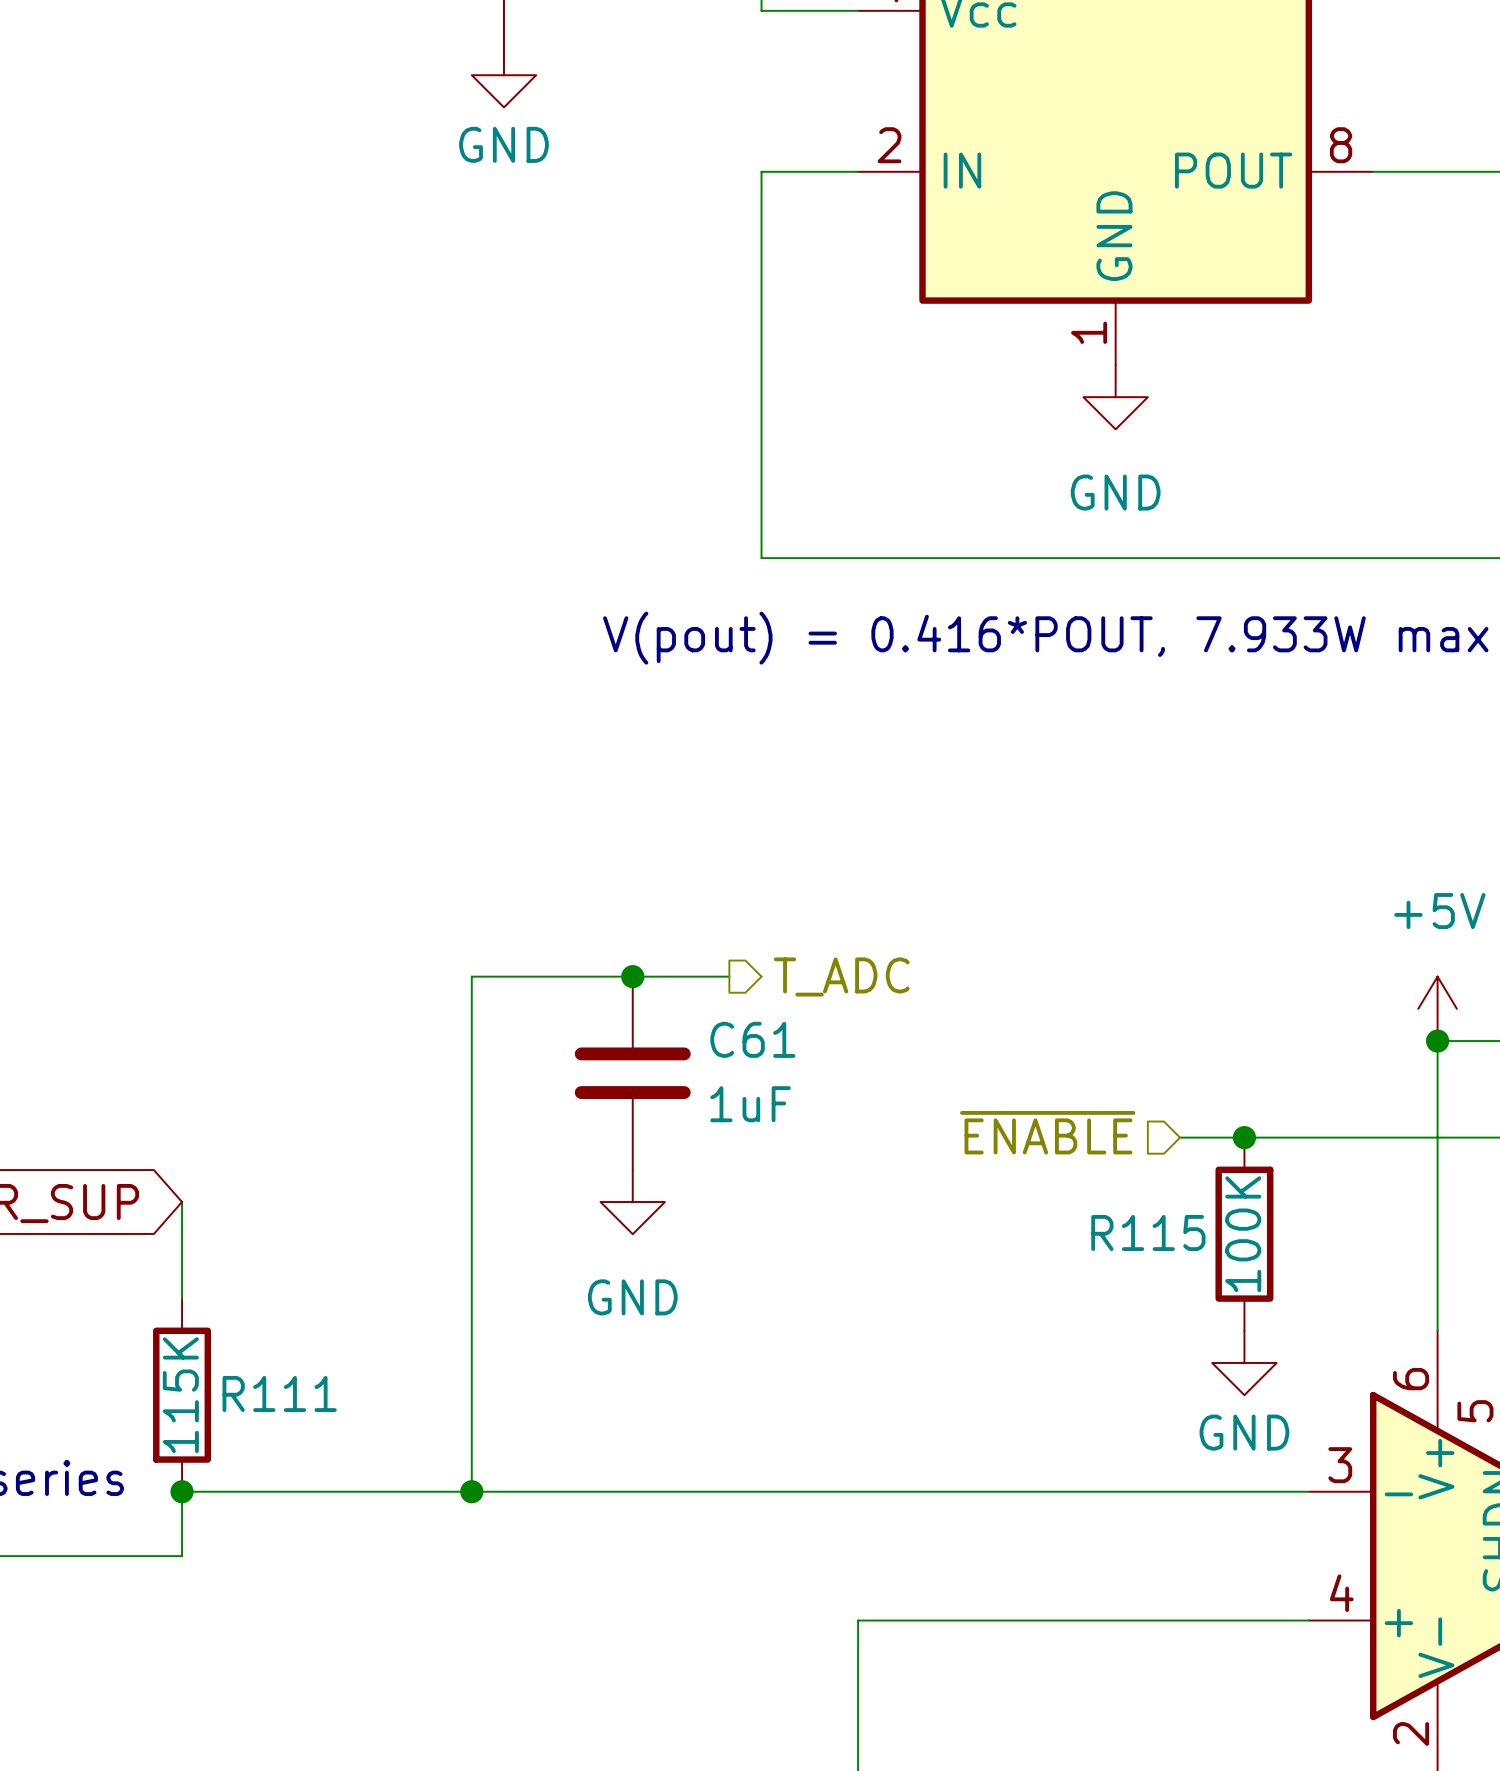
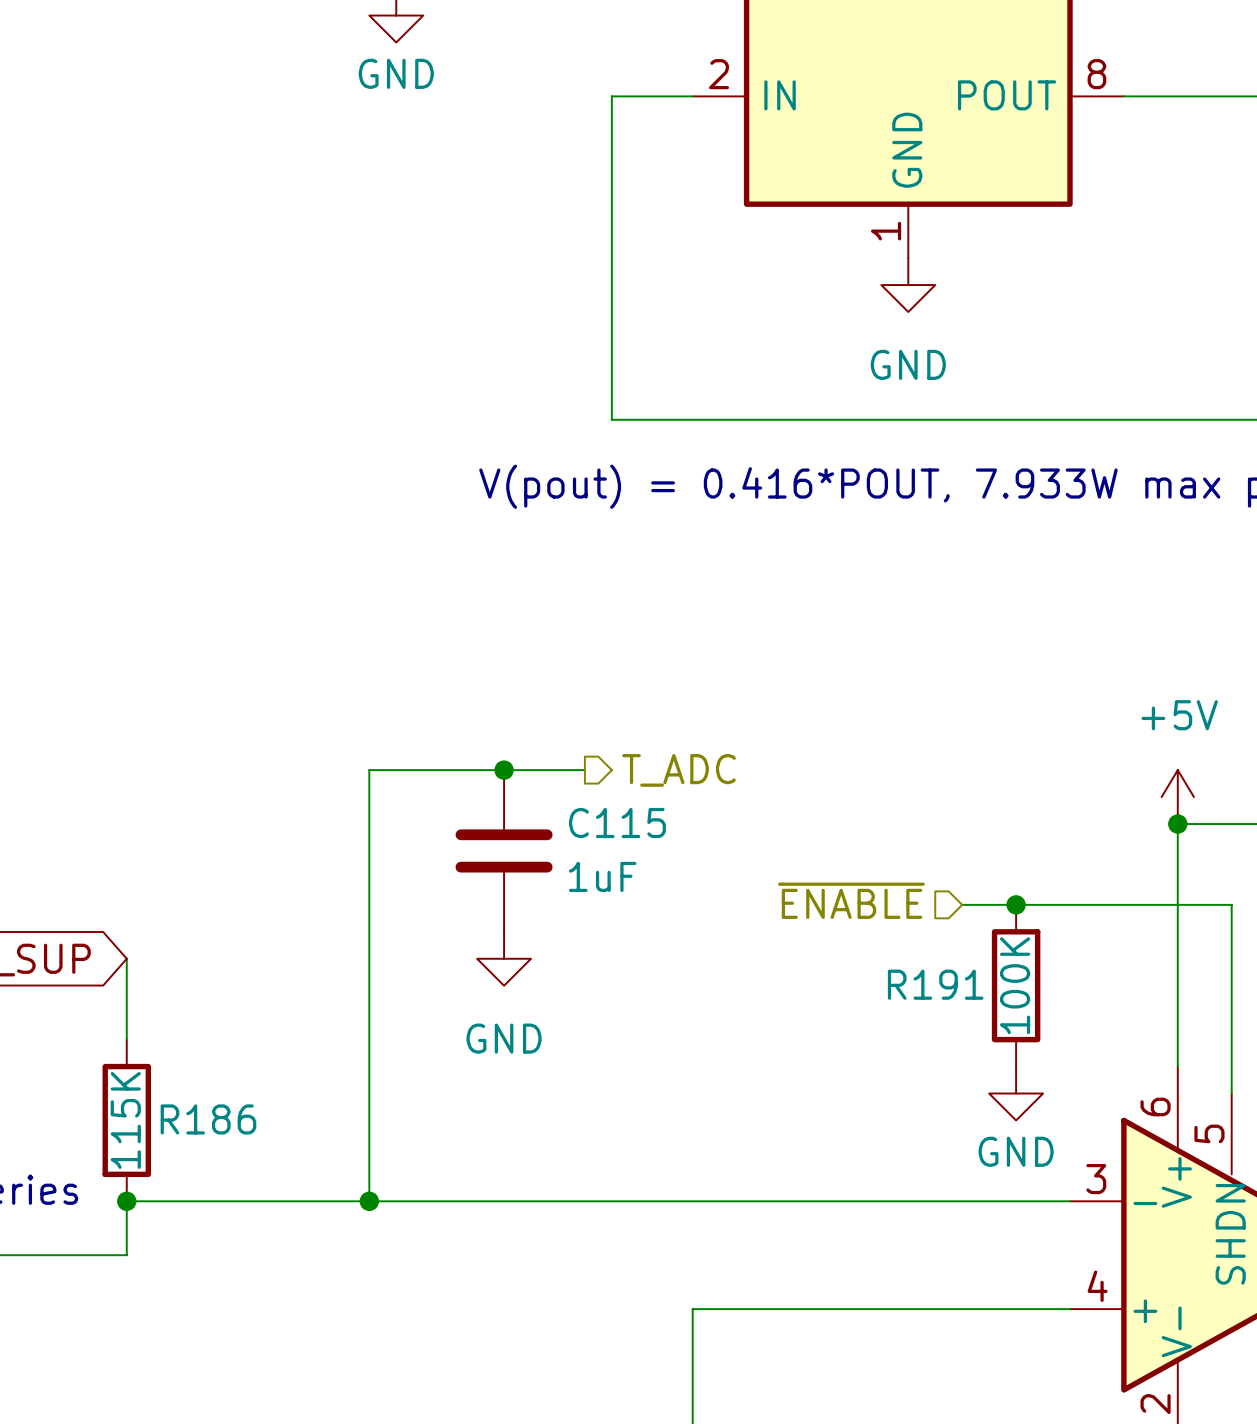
C61 name: C61 (752, 1039) -> C115 (617, 823)
R115 name: R115 (1148, 1233) -> R191 (935, 984)
R111 name: R111 (279, 1393) -> R186 (208, 1119)

